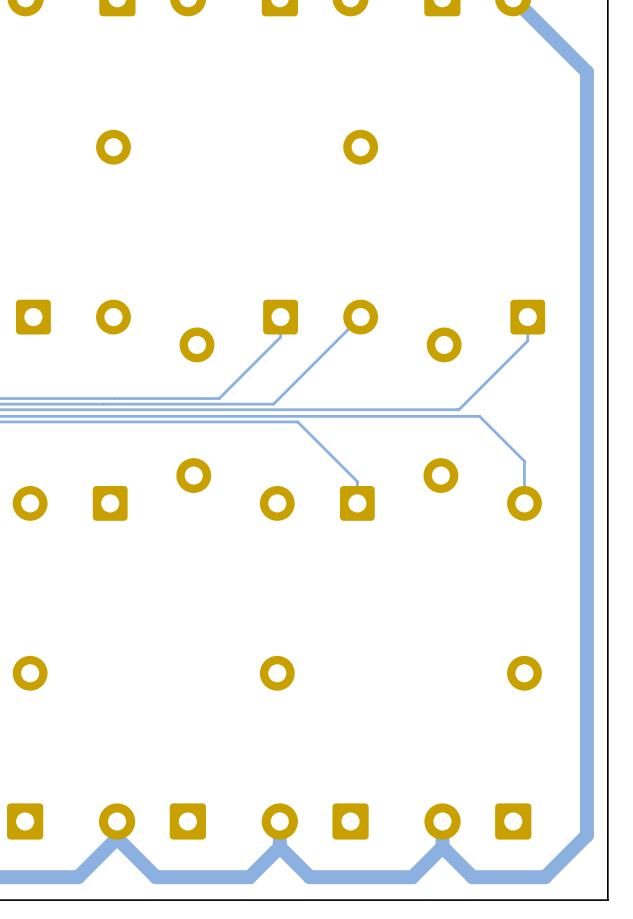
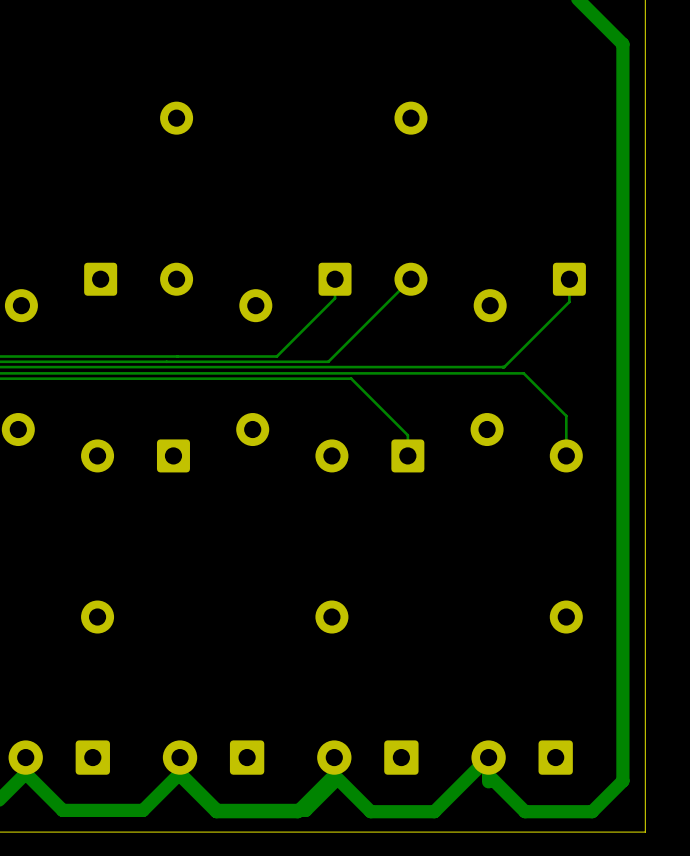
track: (584, 69) (586, 72) (586, 835) (544, 877) (472, 877) (442, 847) (412, 877) (309, 877) (279, 847) -> (622, 44) (622, 780) (592, 811) (525, 811) (488, 775)
track: none -> (488, 757) (434, 811) (370, 811) (334, 775) (297, 811) (216, 811) (180, 775)

